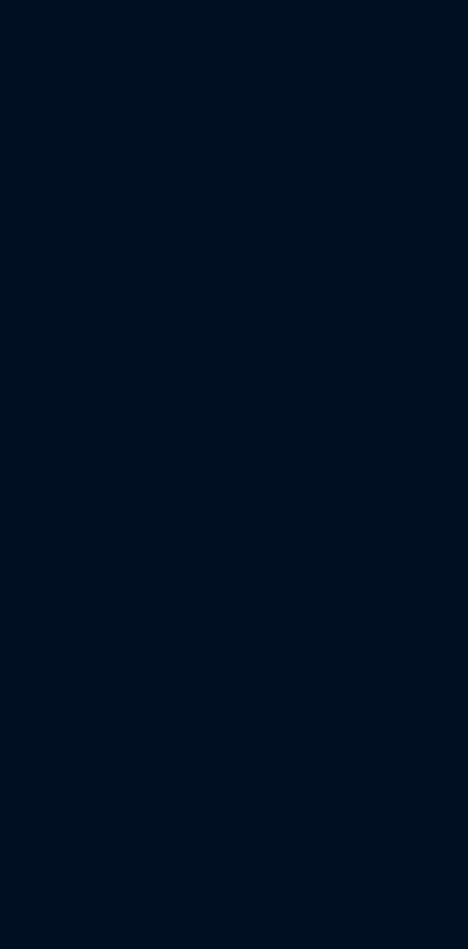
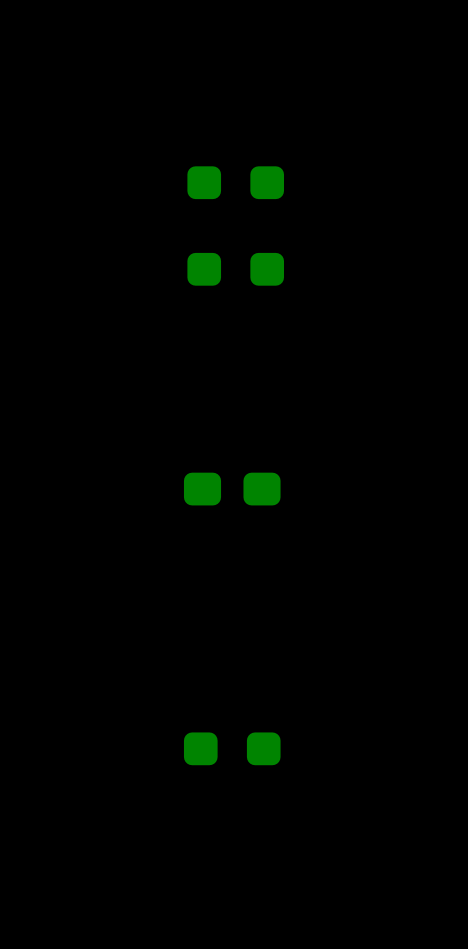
part: none -> (235, 182)
part: none -> (235, 269)
part: none -> (232, 489)
part: none -> (232, 748)

